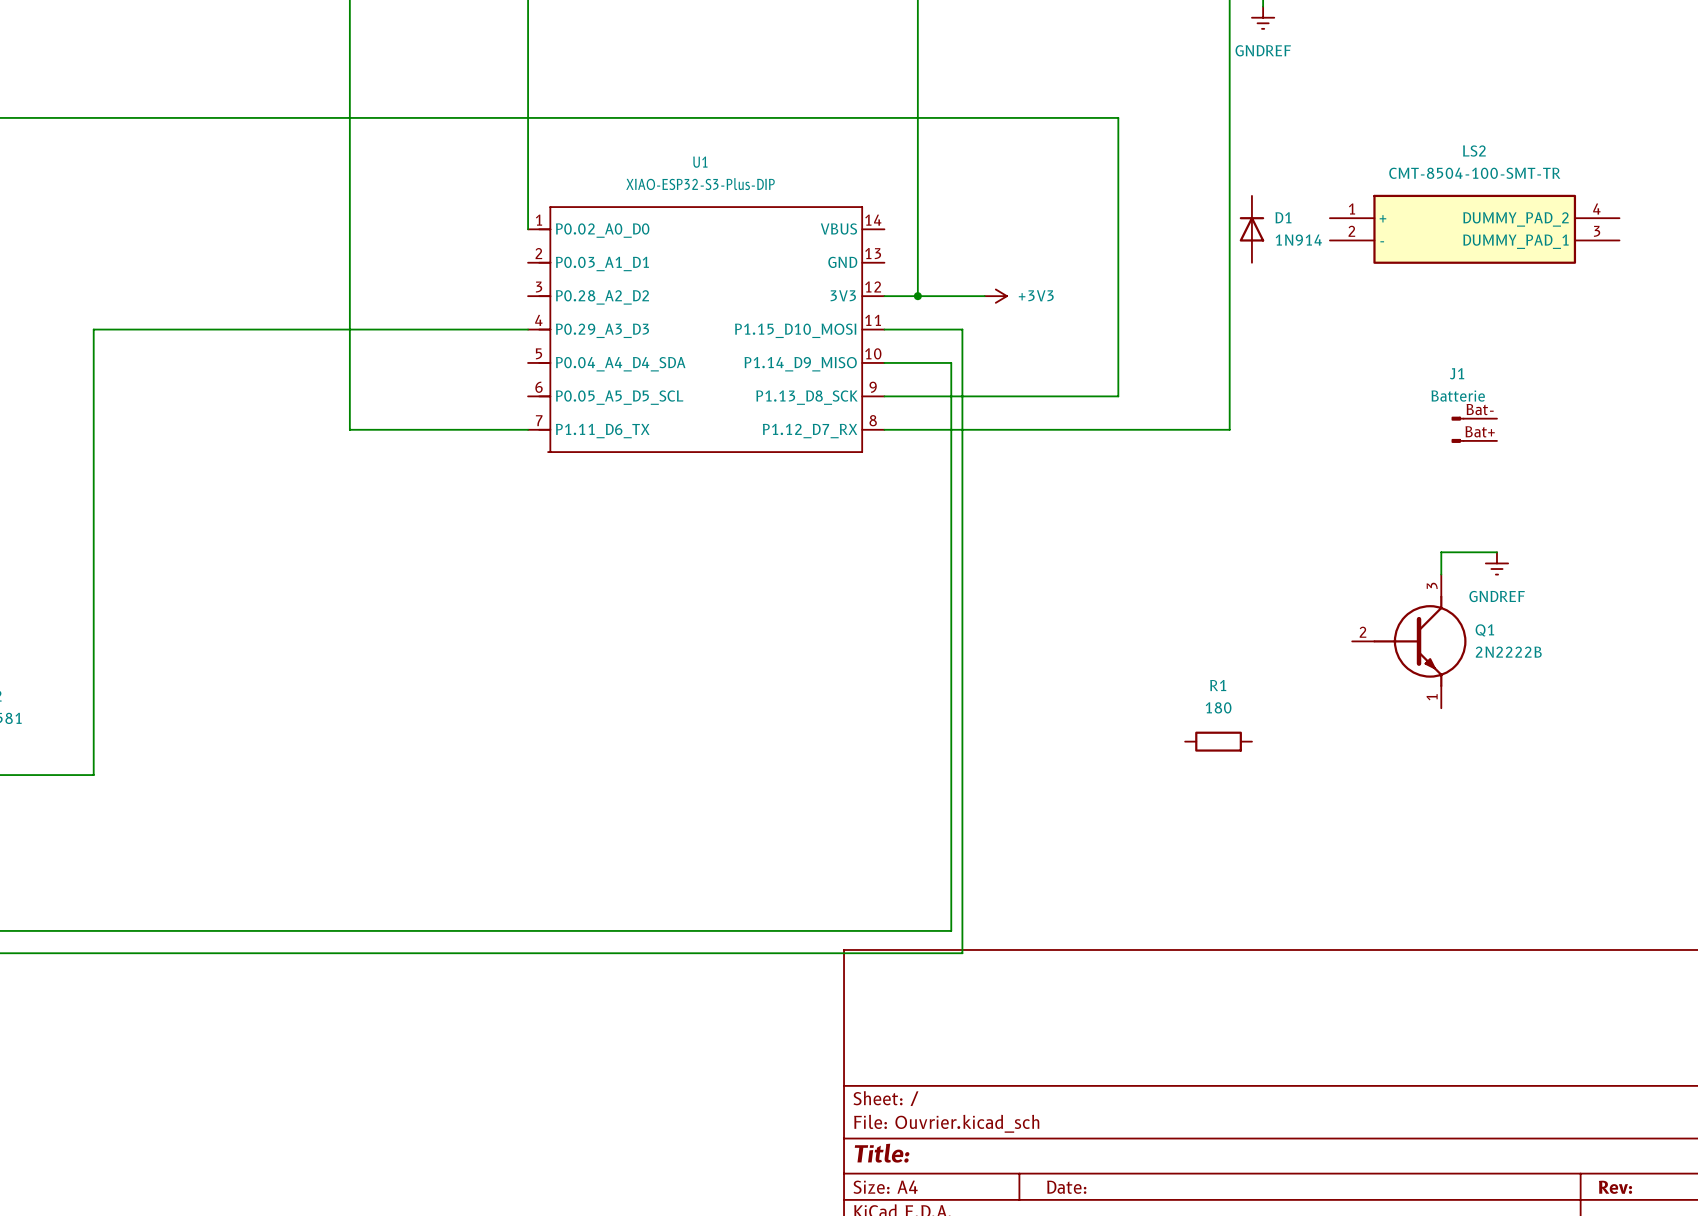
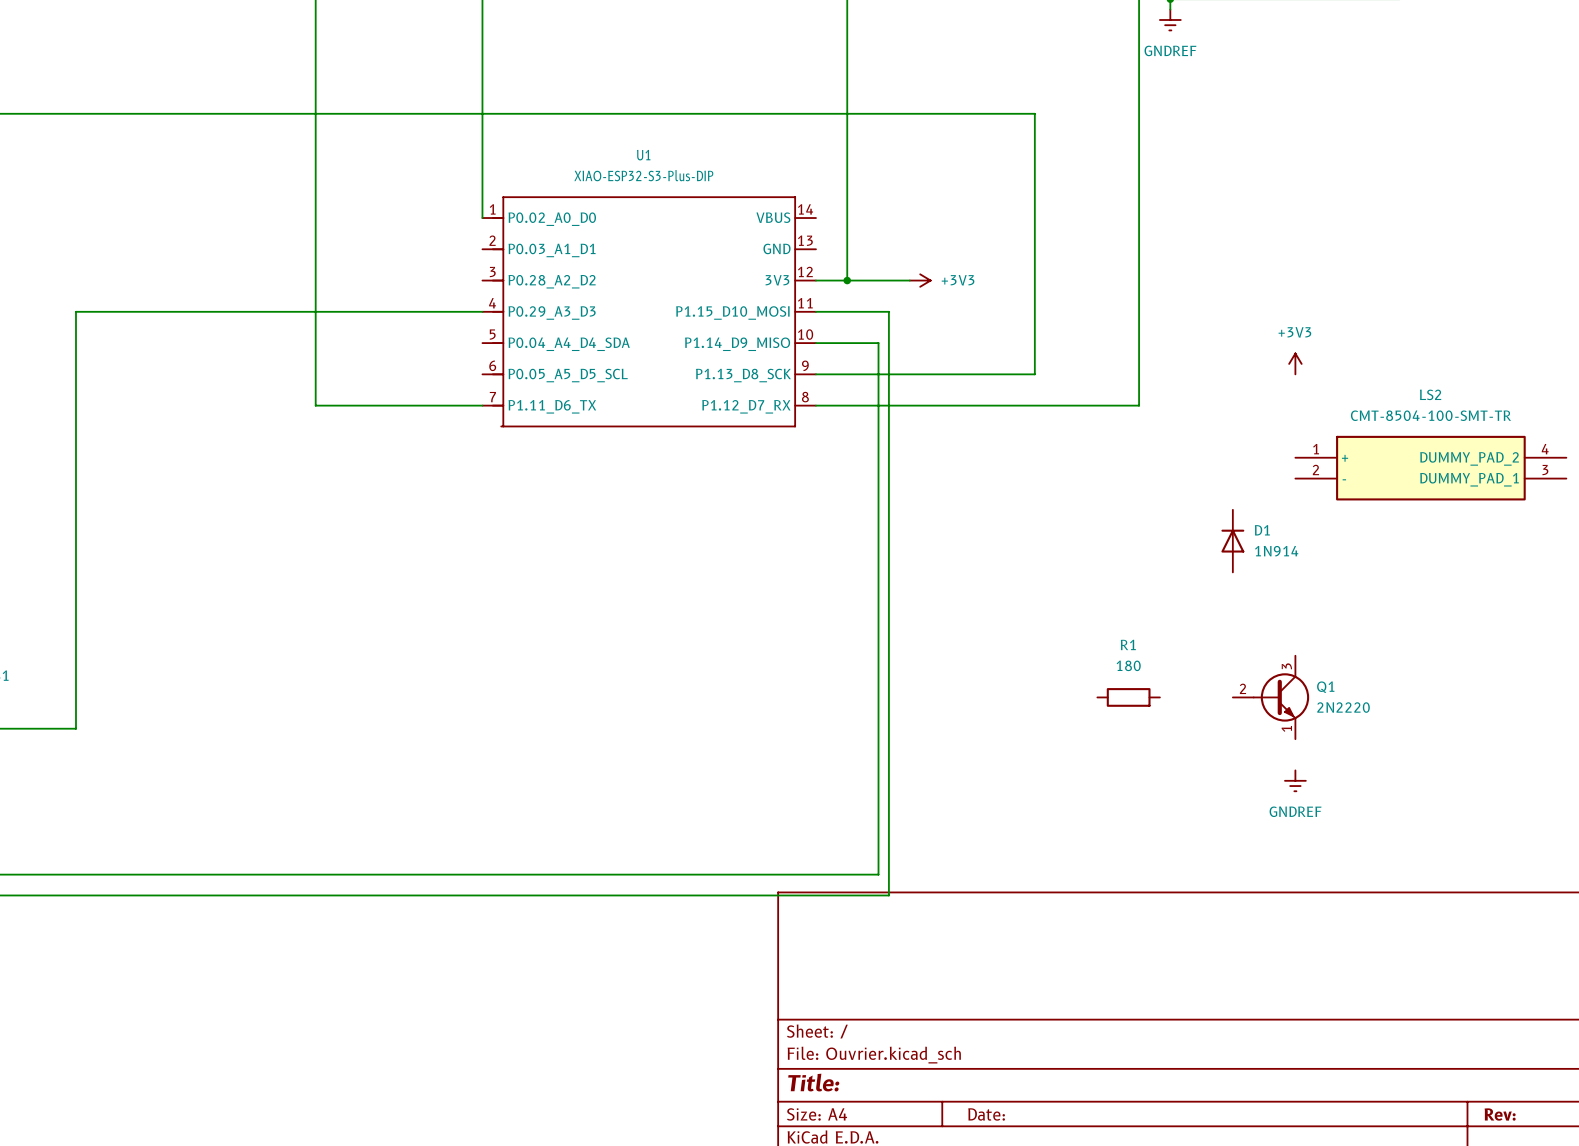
D1 position: (1251, 229) -> (1232, 541)
LS2 position: (1474, 229) -> (1430, 468)
power symbol: none -> +3V3 (1295, 363)
J1: Batterie (1474, 429) -> none
wire: (1496, 552) (1441, 552) (1441, 574) -> none
power symbol: GNDREF (1496, 563) -> none
Q1 symbol: [1352, 574, 1467, 709] -> [1232, 655, 1310, 740]
Q1 value: 2N2222B (1508, 652) -> 2N2220 (1343, 707)
power symbol: none -> GNDREF (1295, 780)

